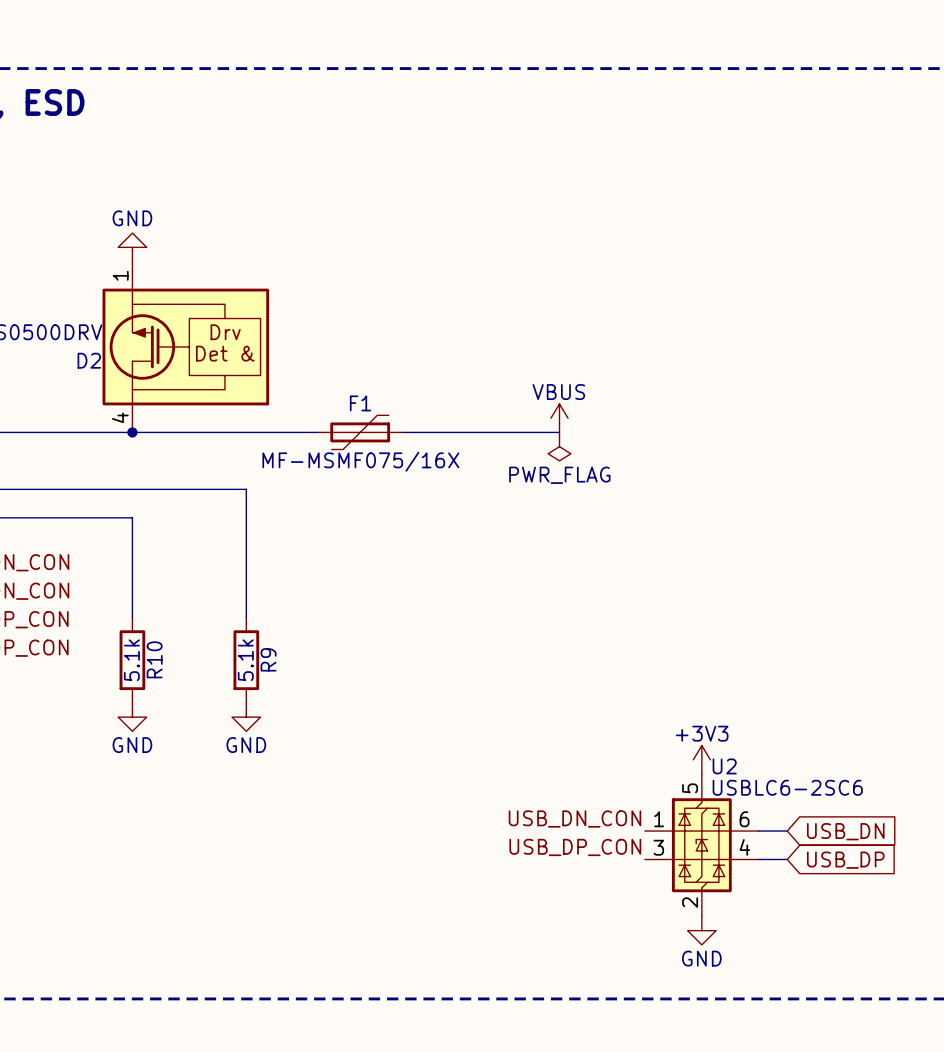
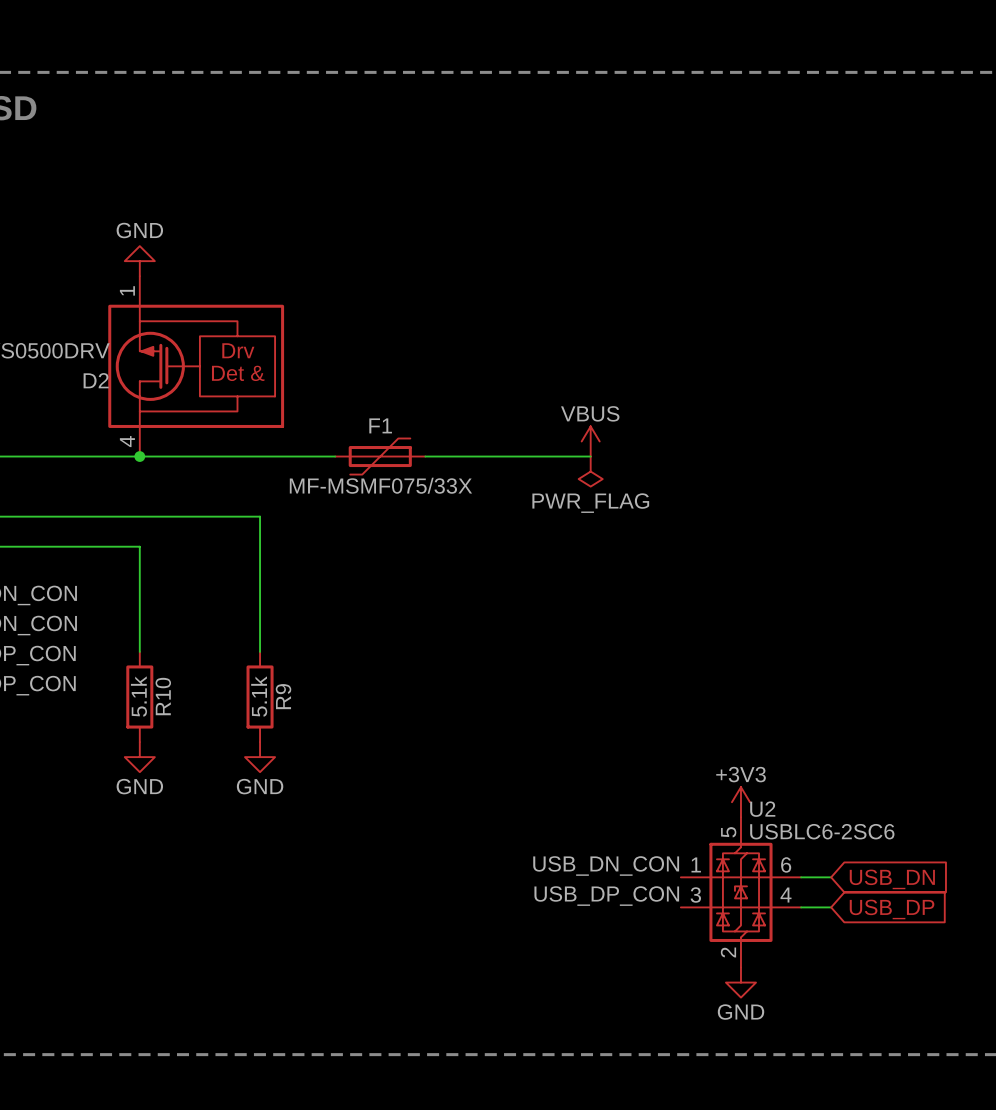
F1 value: MF-MSMF075/16X (360, 461) -> MF-MSMF075/33X (380, 485)

